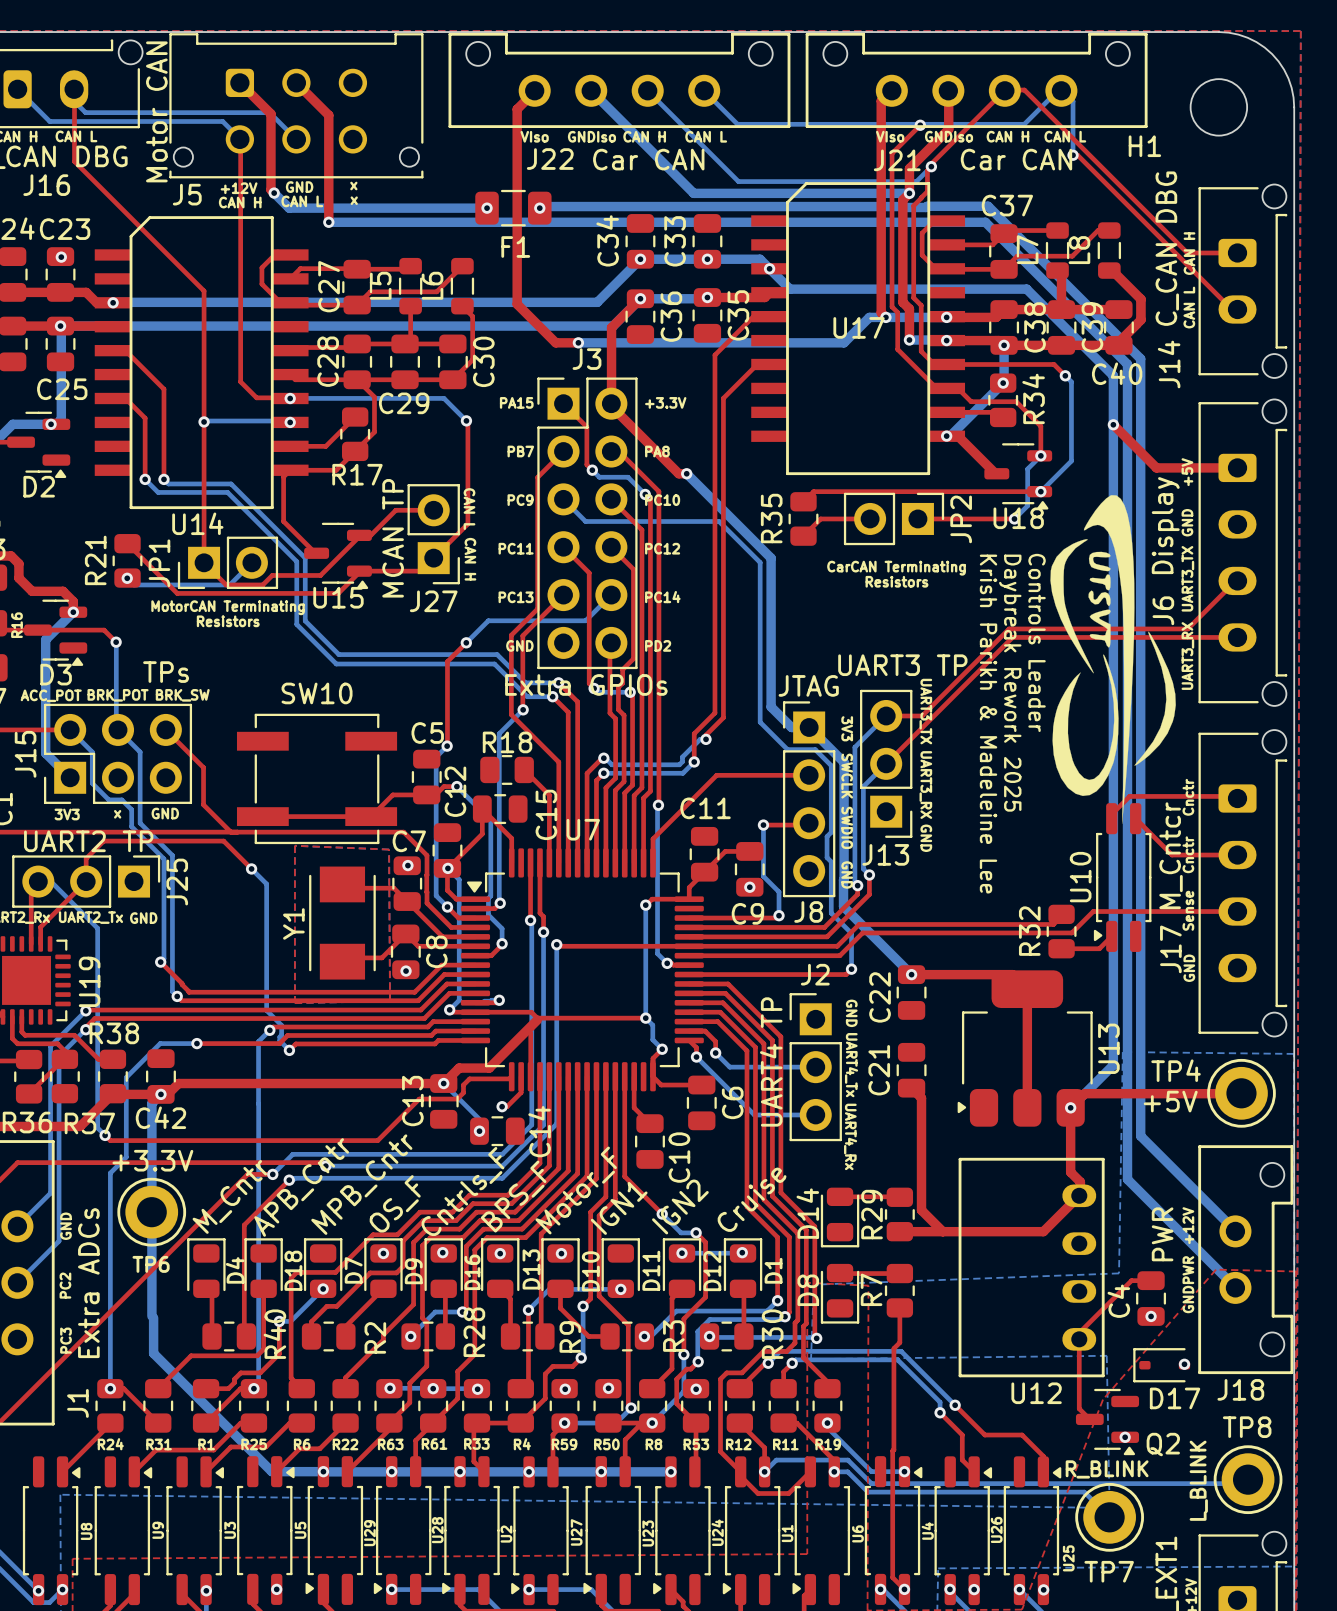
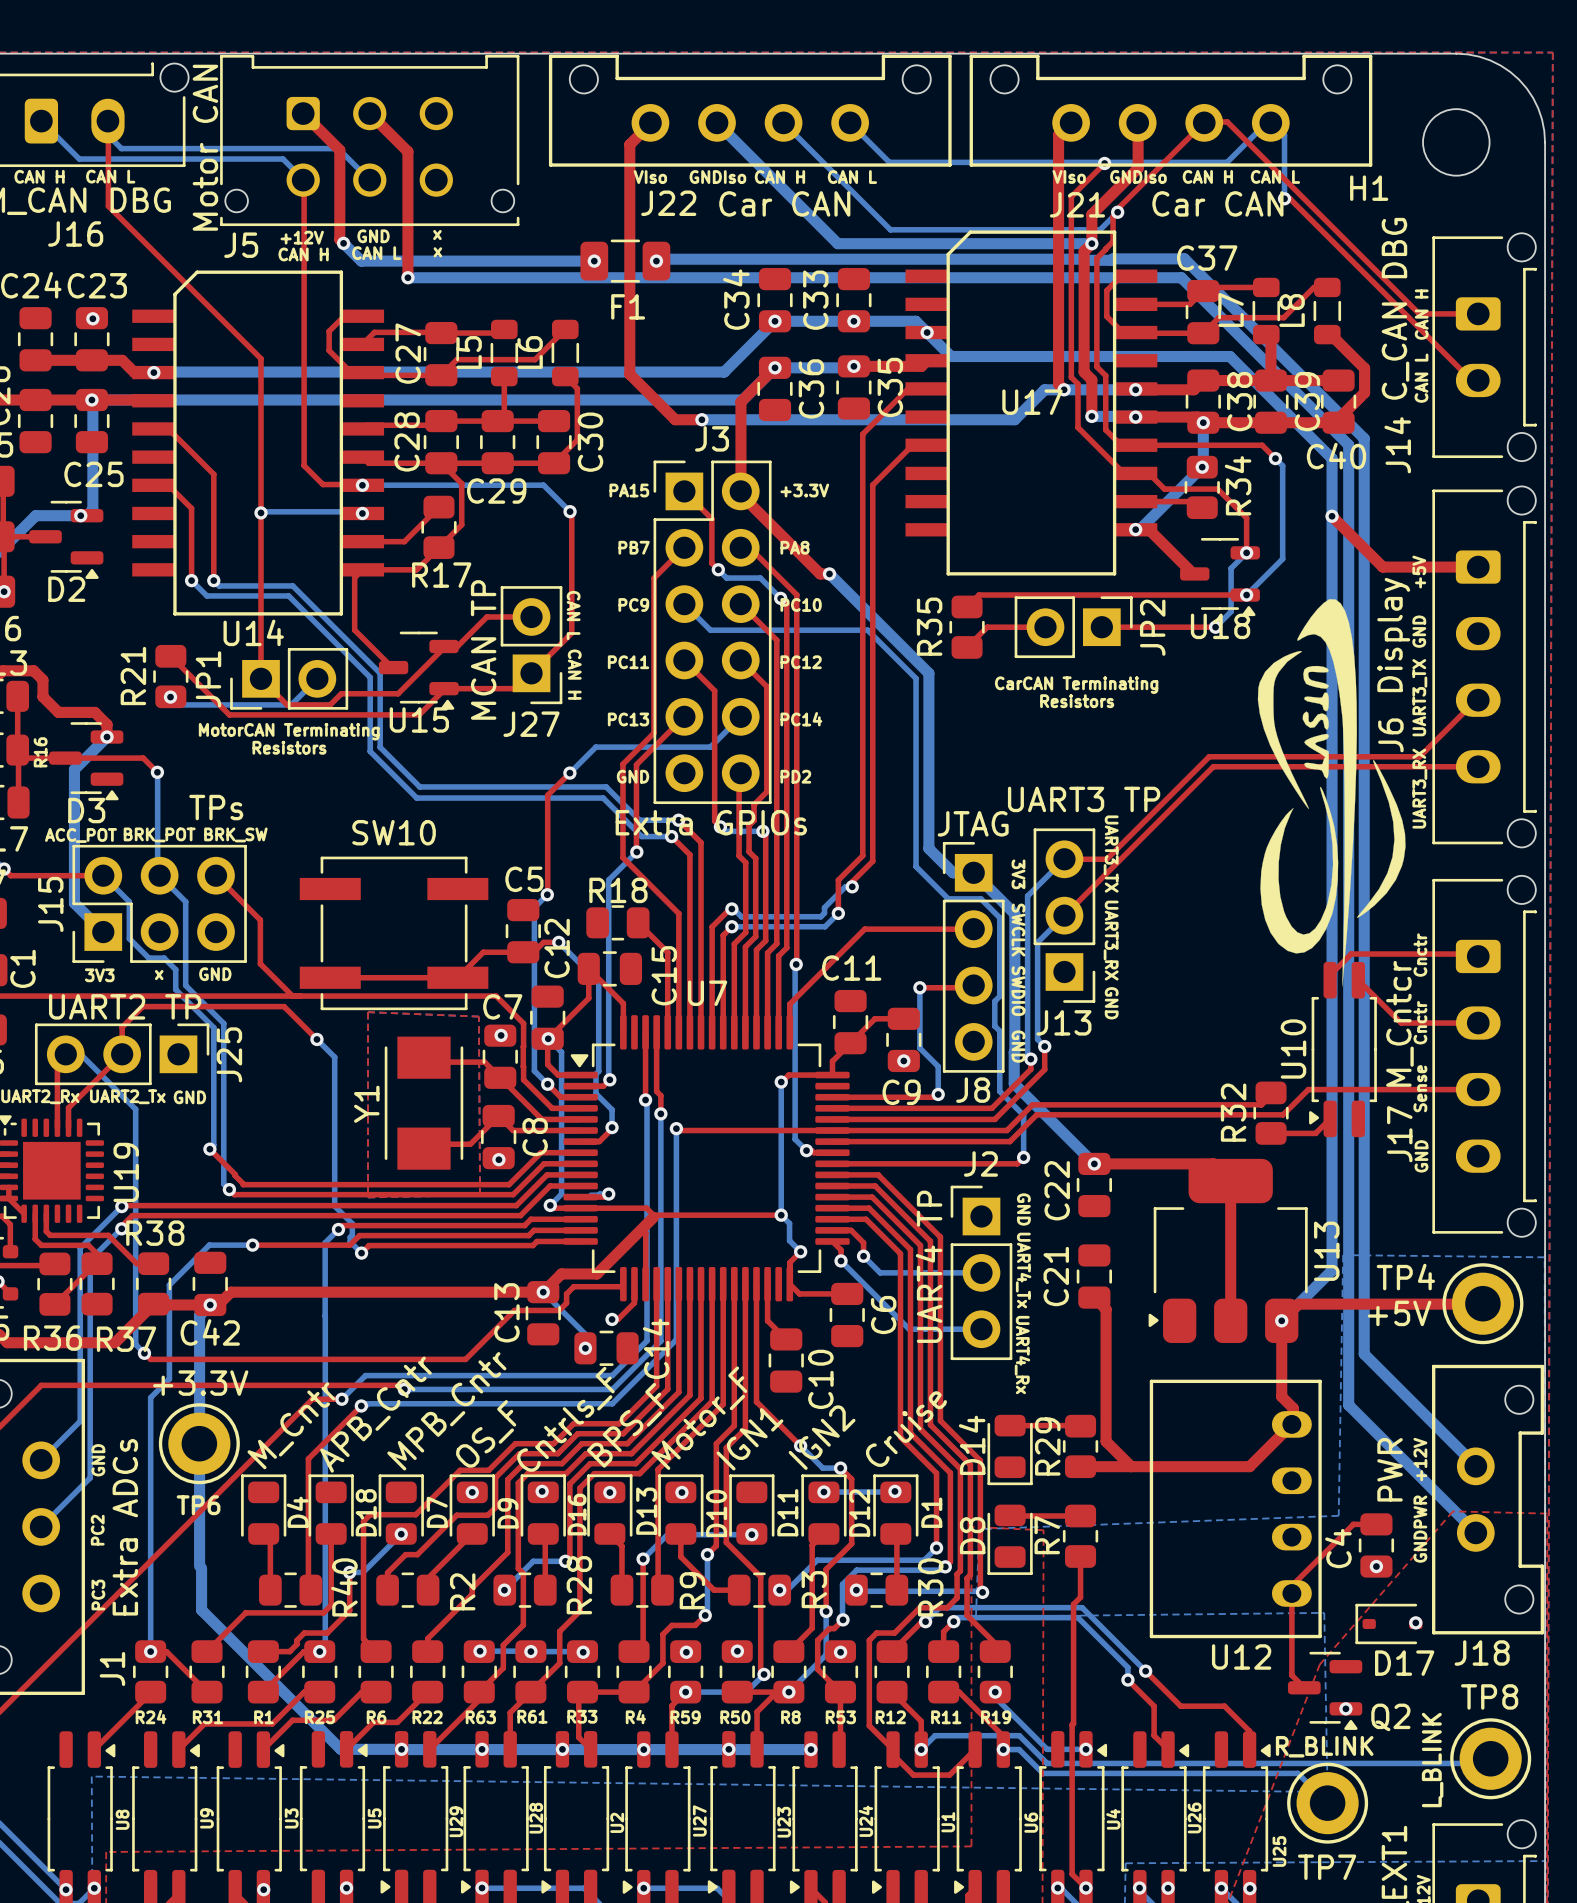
text: Controls Leader (1037, 642) -> none
text: Daybreak Rework 2025 (1010, 683) -> none
text: Krish Parikh & Madeleine Lee (988, 724) -> none

